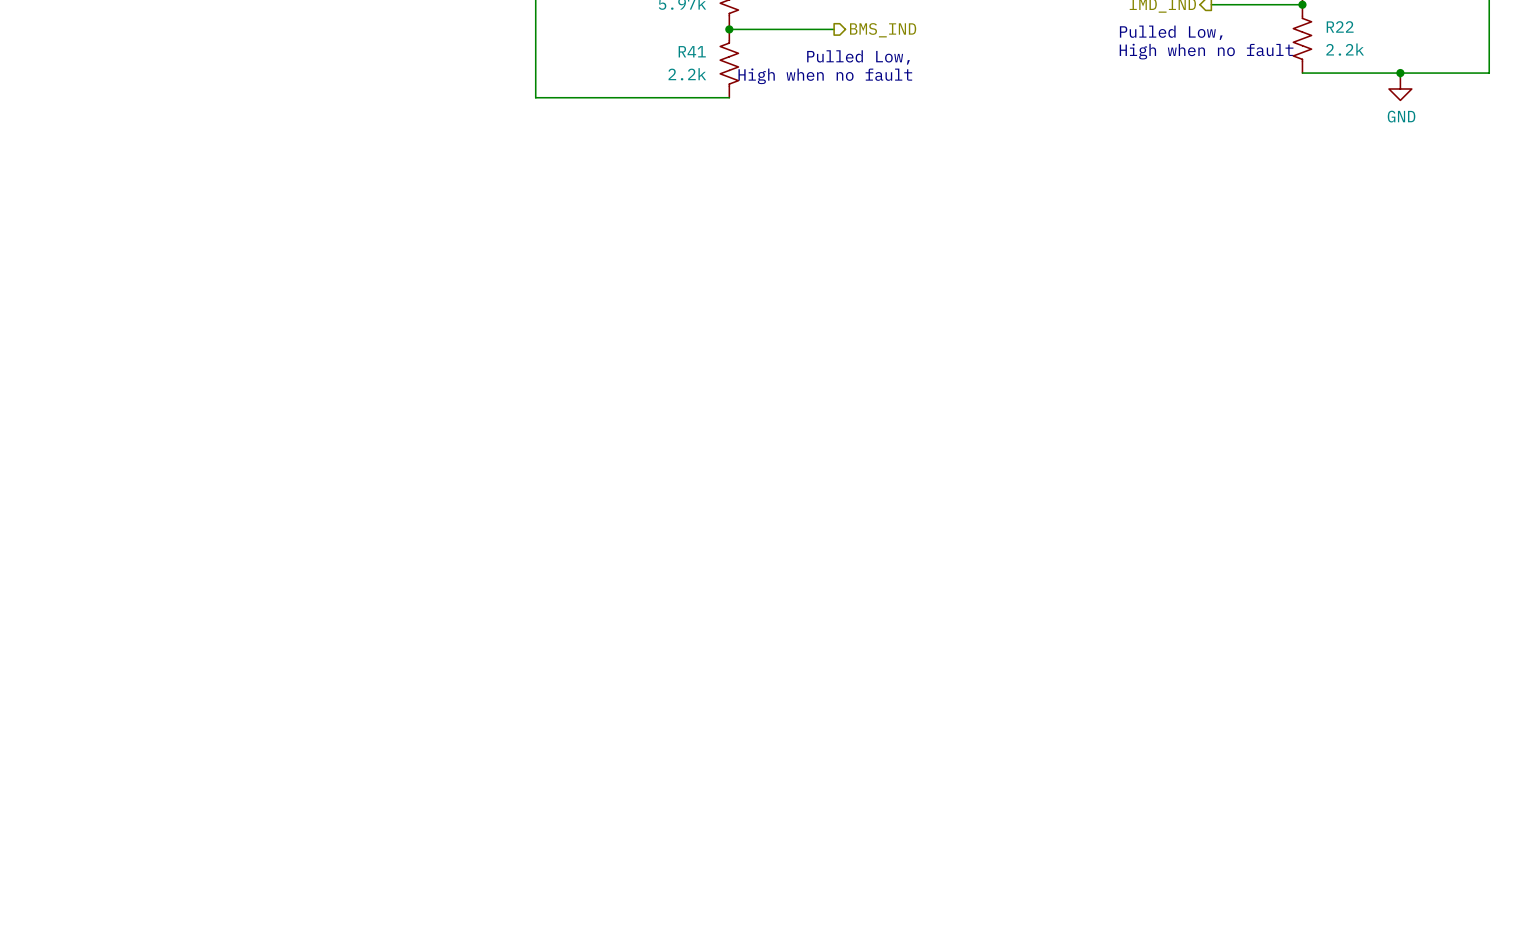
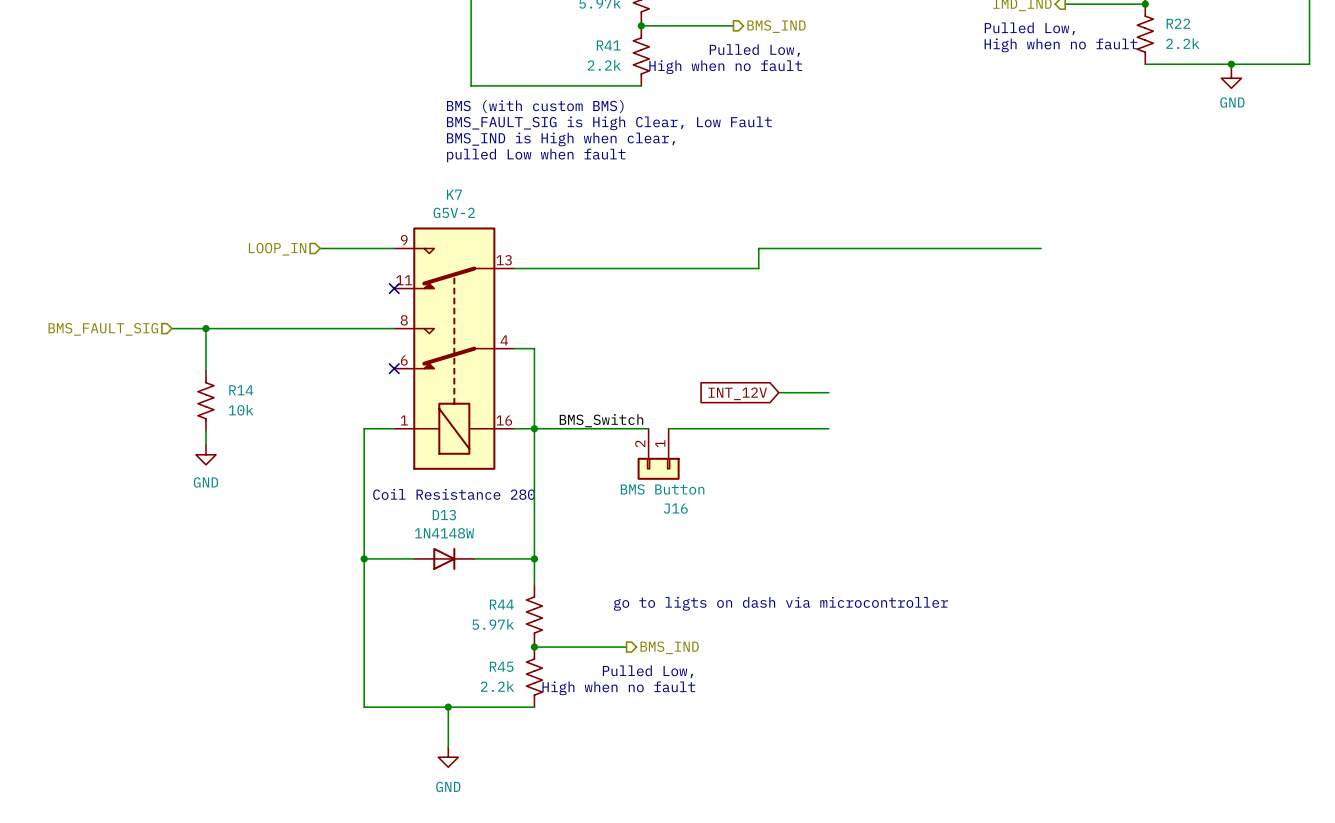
text: none -> BMS (with custom BMS) (535, 106)
text: none -> BMS_FAULT_SIG is High Clear, Low Fault (609, 123)
text: none -> BMS_IND is High when clear, (561, 139)
text: none -> pulled Low when fault (536, 155)
wire: none -> (320, 248) (394, 248)
wire: none -> (1041, 248) (758, 248) (758, 268) (514, 268)
hierarchical label: none -> LOOP_IN (277, 249)
no-connect mark: none -> (394, 288)
wire: none -> (171, 328) (394, 328)
wire: none -> (205, 328) (205, 370)
junction: none -> (205, 328)
hierarchical label: none -> BMS_FAULT_SIG (103, 329)
K7: none -> G5V-2 (454, 348)
wire: none -> (514, 348) (534, 348) (534, 584)
no-connect mark: none -> (394, 368)
wire: none -> (778, 392) (828, 392)
global label: none -> INT_12V (737, 393)
R14: none -> 10k (205, 400)
label: none -> BMS_Switch (601, 420)
wire: none -> (394, 428) (364, 428) (364, 707) (534, 707)
wire: none -> (514, 428) (648, 428)
junction: none -> (534, 428)
wire: none -> (668, 428) (828, 428)
wire: none -> (205, 430) (205, 444)
J16: none -> BMS Button (658, 454)
power symbol: none -> GND (205, 454)
text: none -> Coil Resistance 280 (454, 494)
wire: none -> (364, 558) (414, 558)
junction: none -> (364, 558)
D13: none -> 1N4148W (444, 558)
wire: none -> (474, 558) (534, 558)
junction: none -> (534, 558)
text: none -> go to ligts on dash via microcontroller (780, 603)
R44: none -> 5.97k (534, 615)
wire: none -> (534, 645) (534, 647) (626, 647)
junction: none -> (534, 647)
hierarchical label: none -> BMS_IND (669, 647)
text: none -> Pulled Low, (648, 671)
R45: none -> 2.2k (534, 677)
text: none -> High when no fault (618, 688)
wire: none -> (448, 707) (448, 747)
junction: none -> (448, 707)
power symbol: none -> GND (448, 757)

